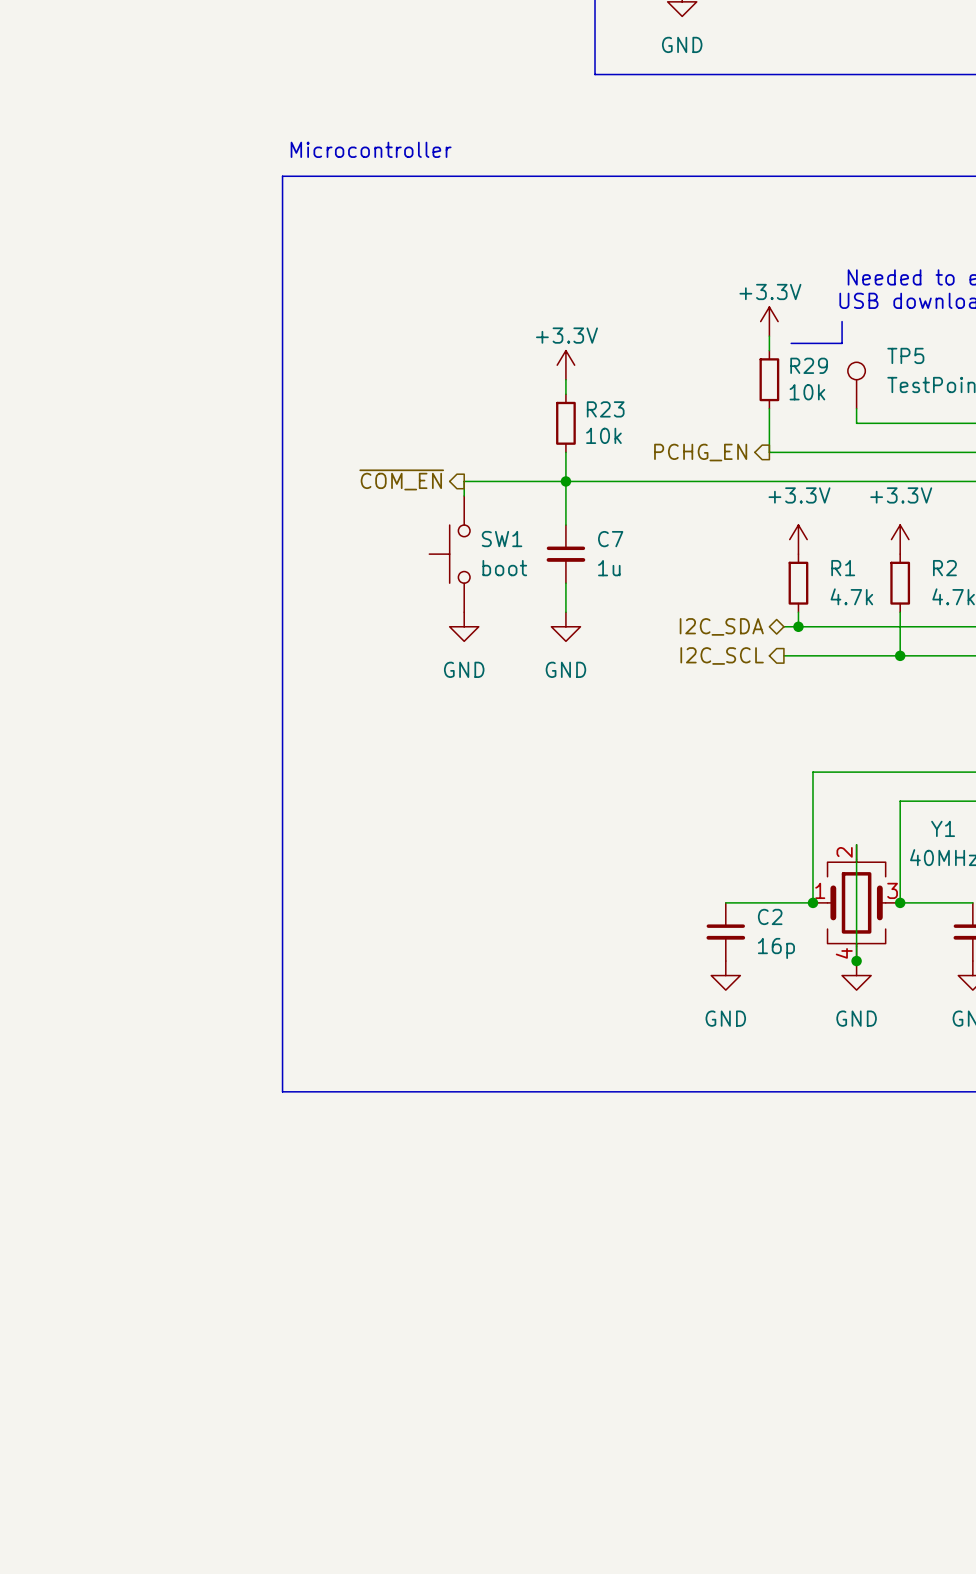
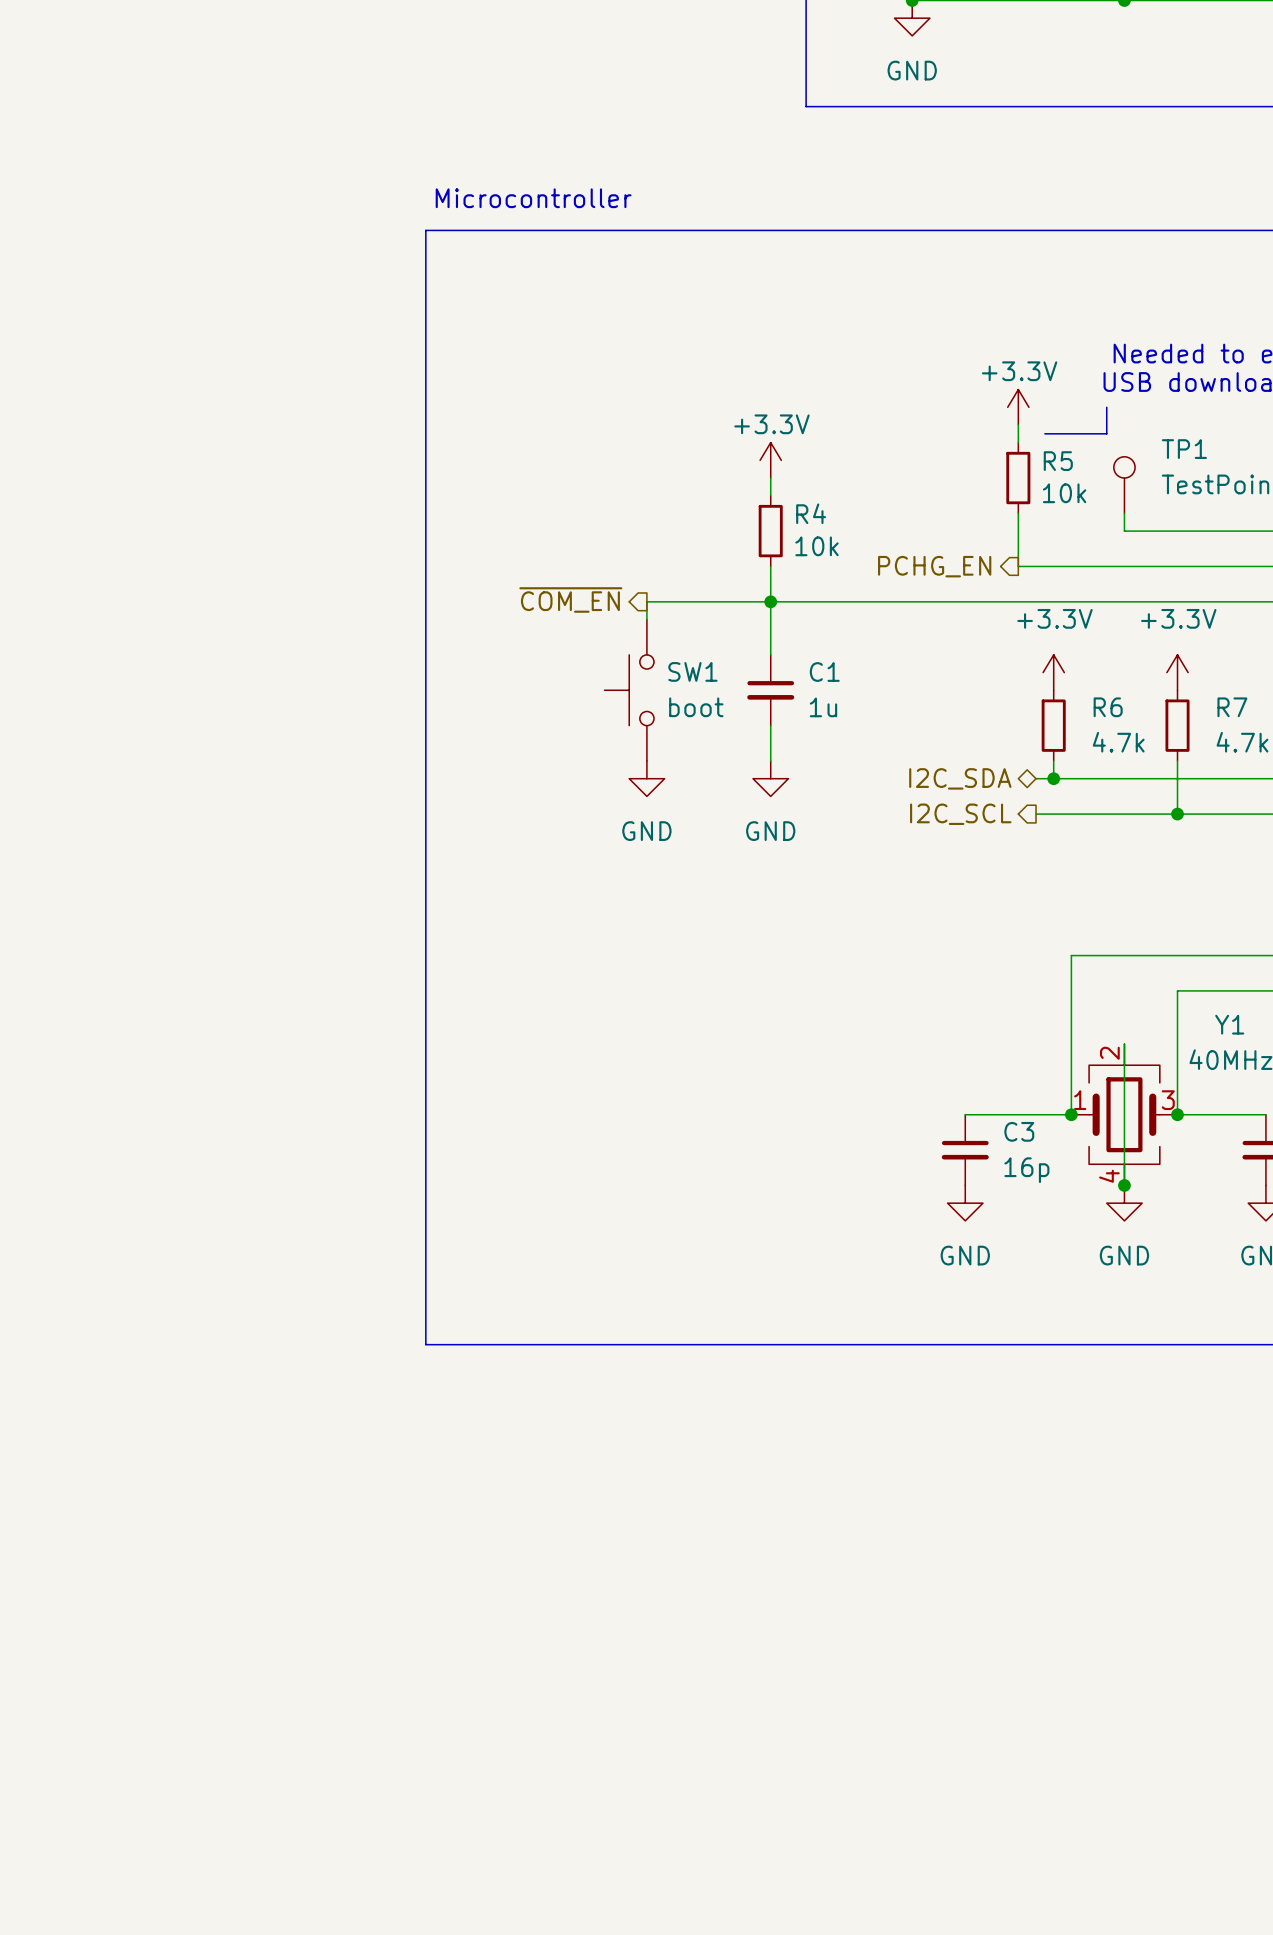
TP5 name: TP5 (905, 355) -> TP1 (1184, 449)
R29 name: R29 (809, 365) -> R5 (1058, 461)
R23 name: R23 (605, 409) -> R4 (811, 513)
C7 name: C7 (610, 539) -> C1 (824, 672)
R1 name: R1 (843, 568) -> R6 (1108, 707)
R2 name: R2 (944, 568) -> R7 (1232, 707)
C2 name: C2 (770, 916) -> C3 (1019, 1131)

